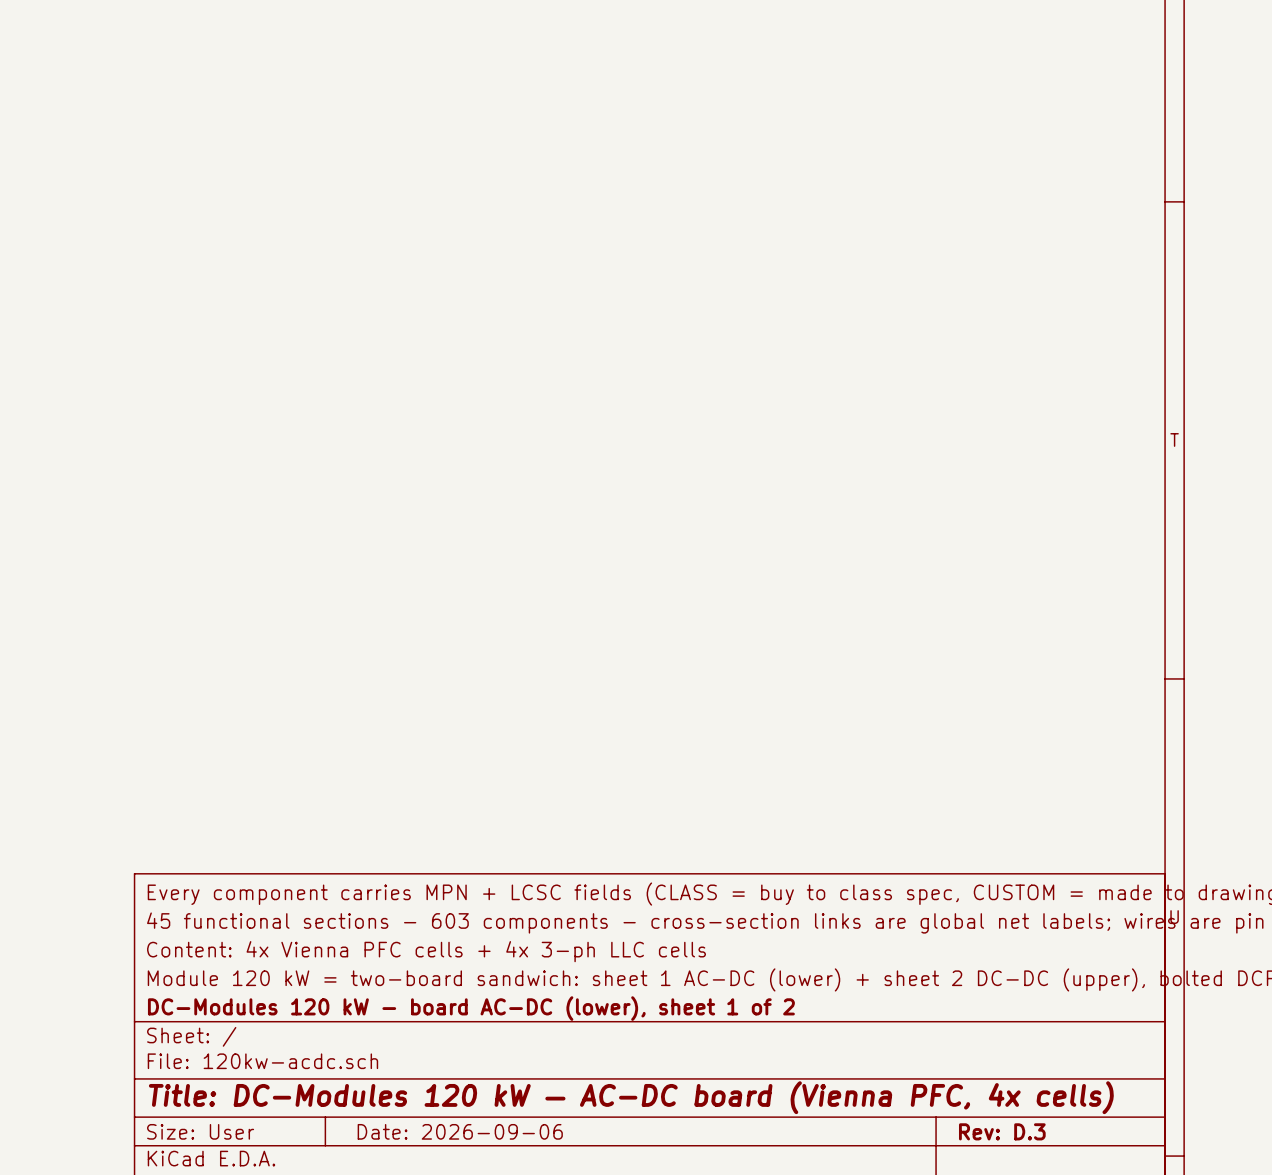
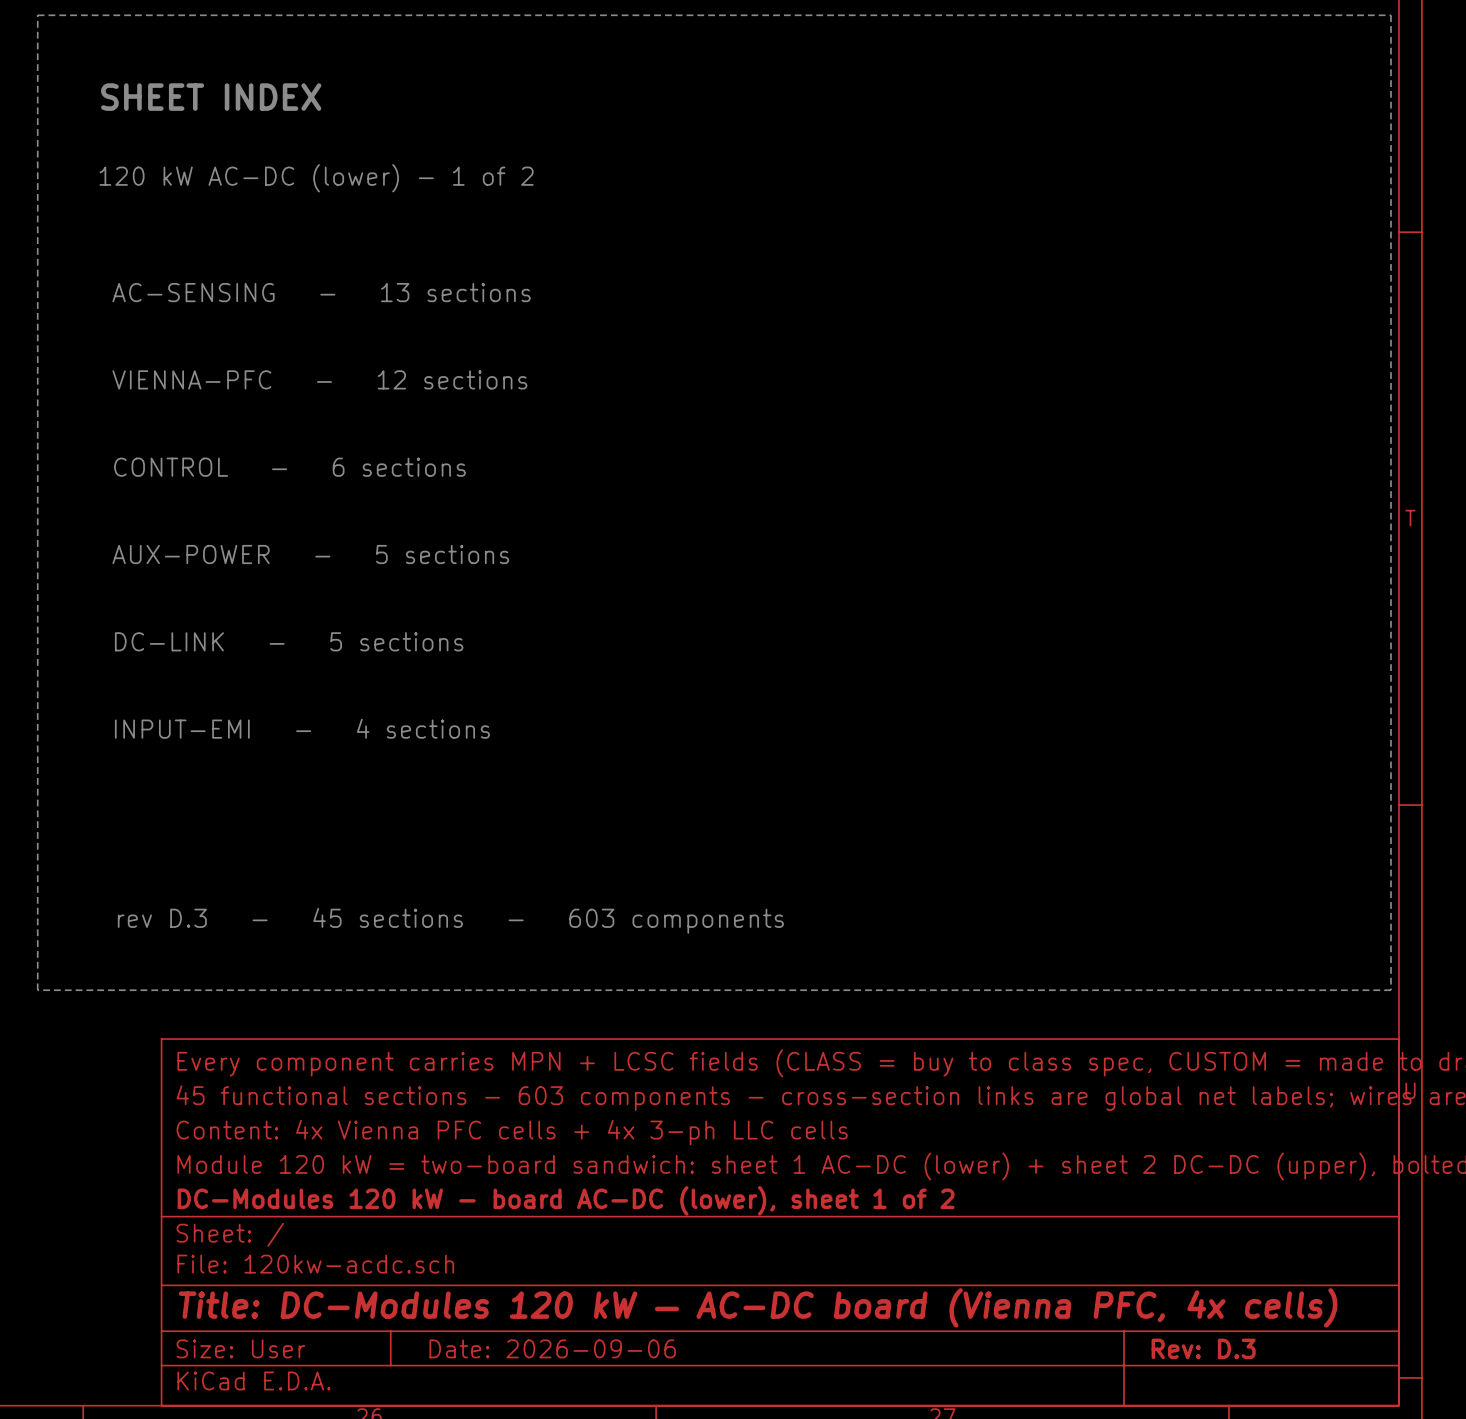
line: none -> (37, 15) (1390, 15) (1390, 990) (37, 990) (37, 15)
text: none -> SHEET INDEX (211, 97)
text: none -> 120 kW AC-DC (lower) - 1 of 2 (316, 178)
text: none -> AC-SENSING - 13 sections (321, 292)
text: none -> VIENNA-PFC - 12 sections (319, 379)
text: none -> CONTROL - 6 sections (289, 467)
text: none -> AUX-POWER - 5 sections (310, 554)
text: none -> DC-LINK - 5 sections (289, 641)
text: none -> INPUT-EMI - 4 sections (302, 728)
text: none -> rev D.3 - 45 sections - 603 components (450, 920)

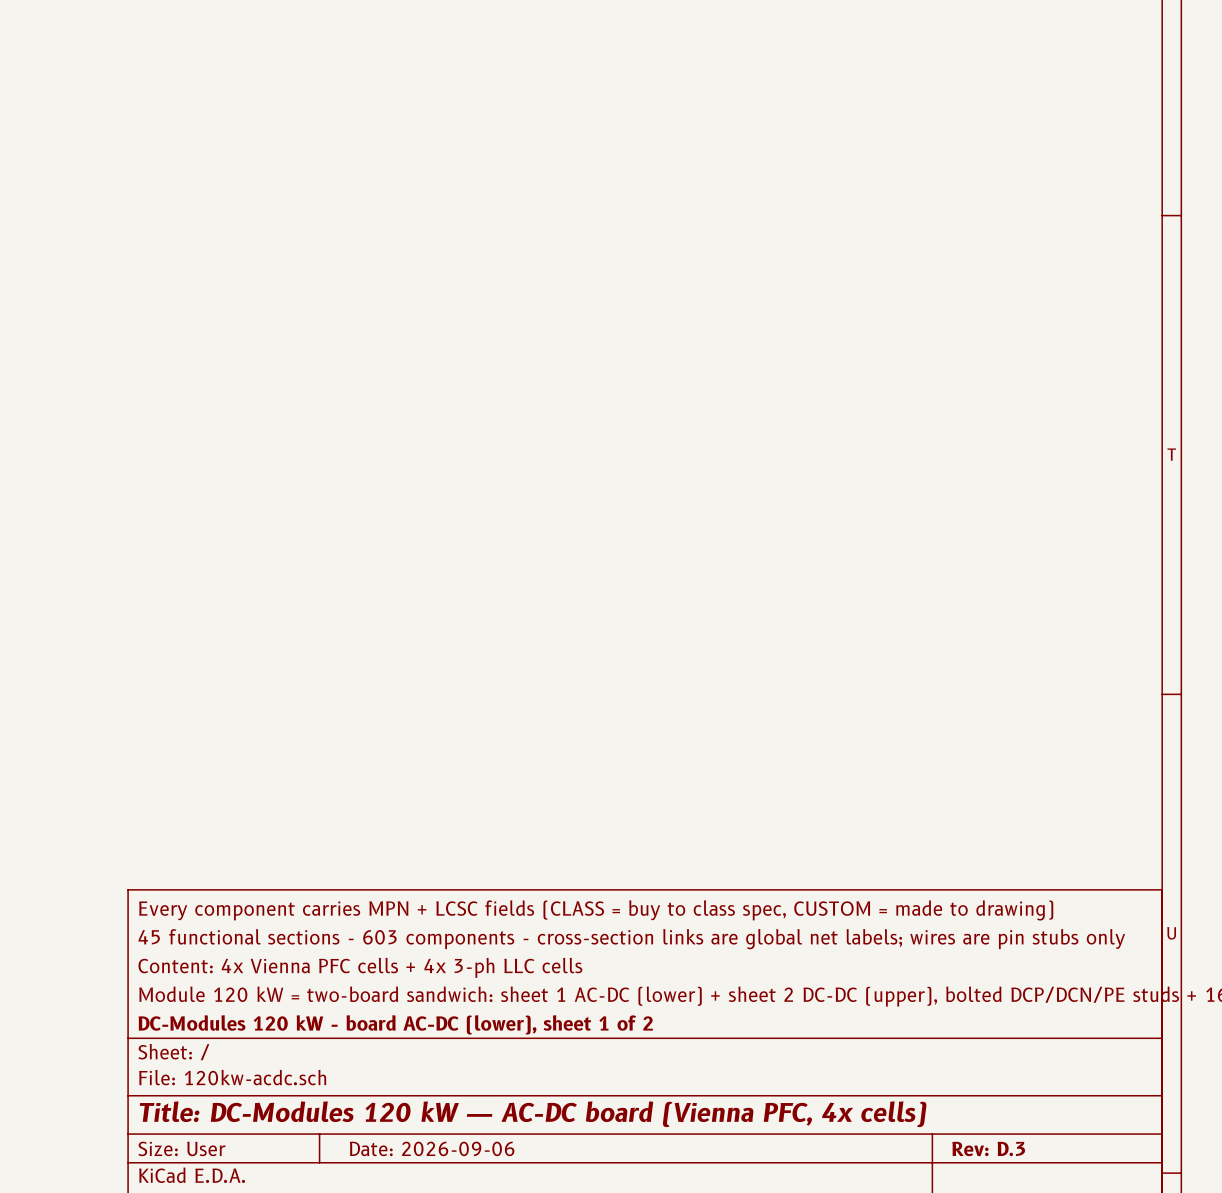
line: (37, 15) (1390, 15) (1390, 990) (37, 990) (37, 15) -> none
text: SHEET INDEX (211, 97) -> none
text: 120 kW AC-DC (lower) - 1 of 2 (316, 178) -> none
text: AC-SENSING - 13 sections (321, 292) -> none
text: VIENNA-PFC - 12 sections (319, 379) -> none
text: CONTROL - 6 sections (289, 467) -> none
text: AUX-POWER - 5 sections (310, 554) -> none
text: DC-LINK - 5 sections (289, 641) -> none
text: INPUT-EMI - 4 sections (302, 728) -> none
text: rev D.3 - 45 sections - 603 components (450, 920) -> none

